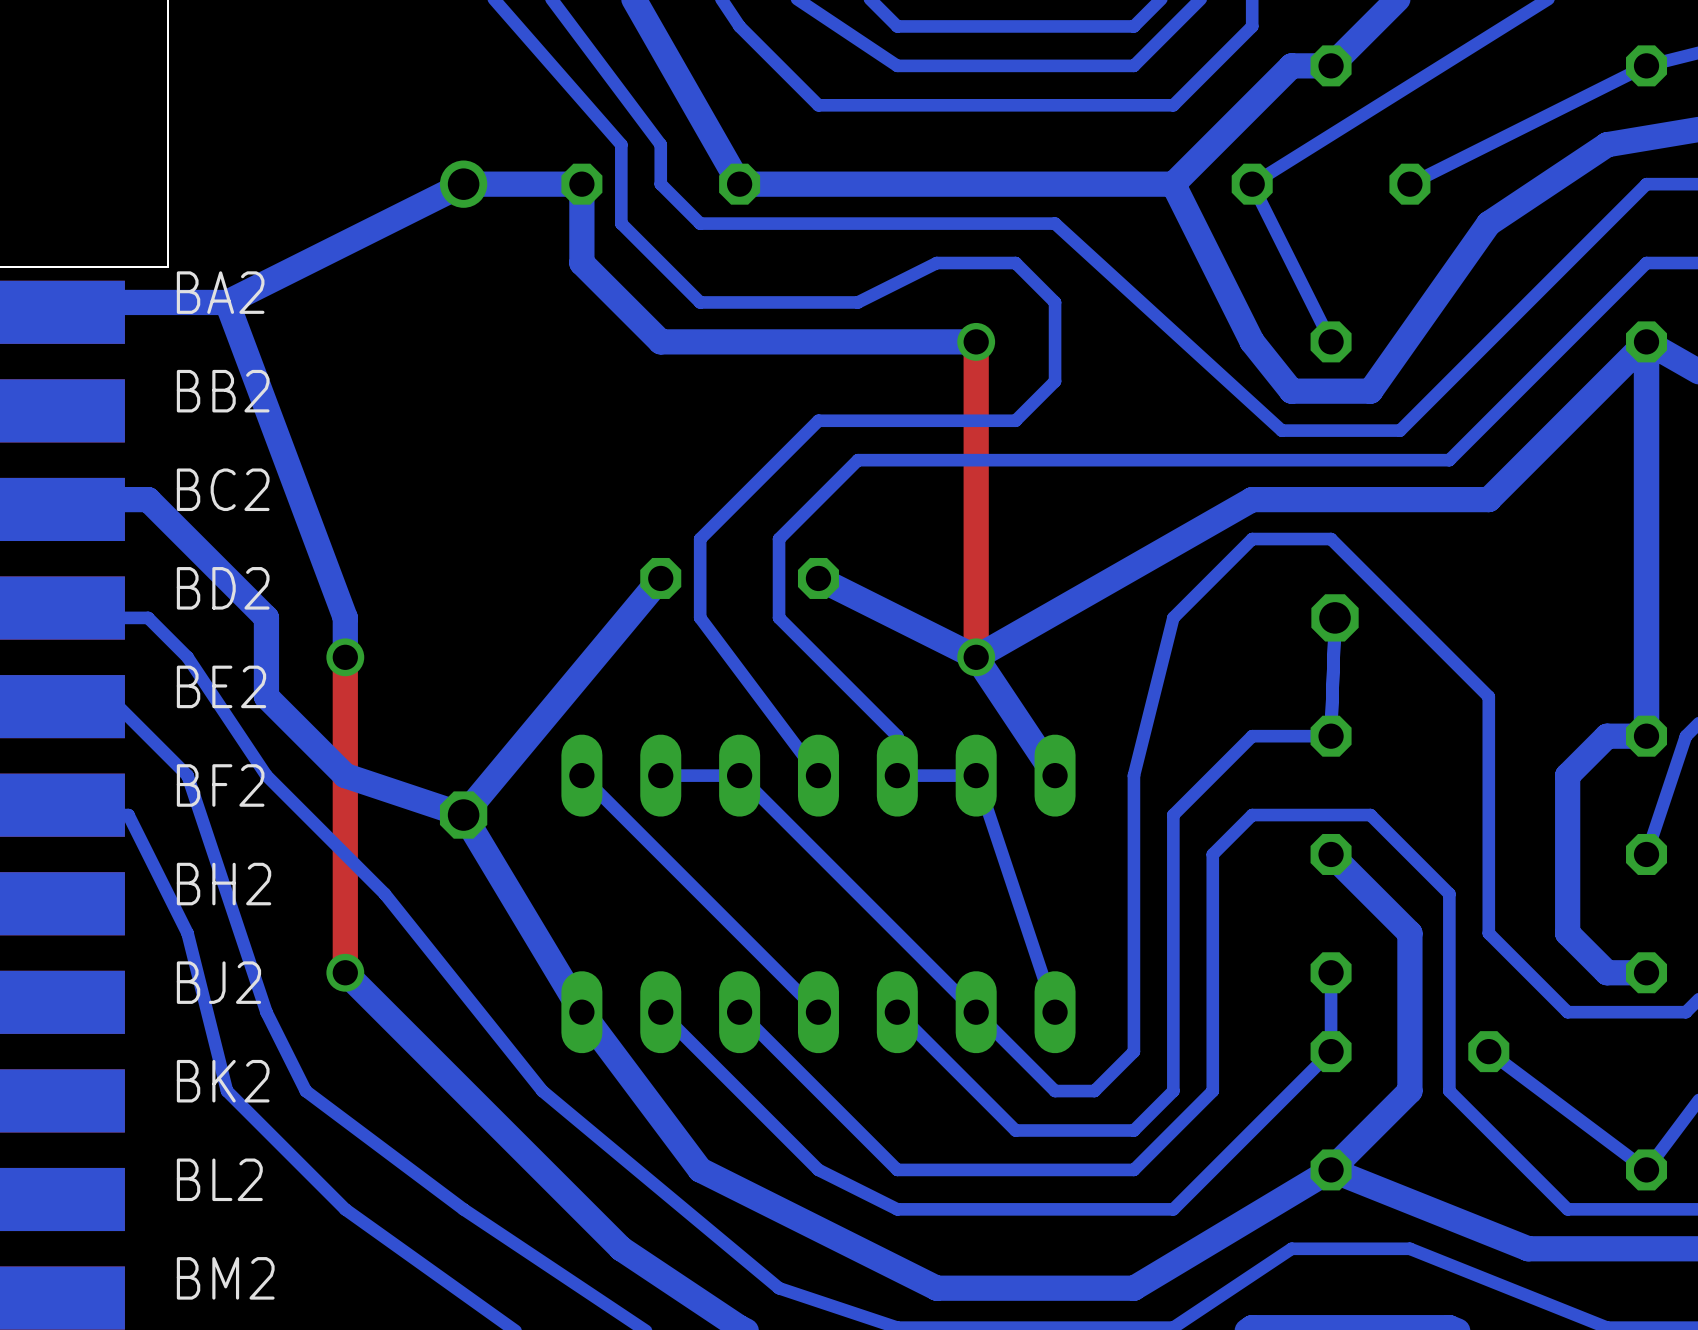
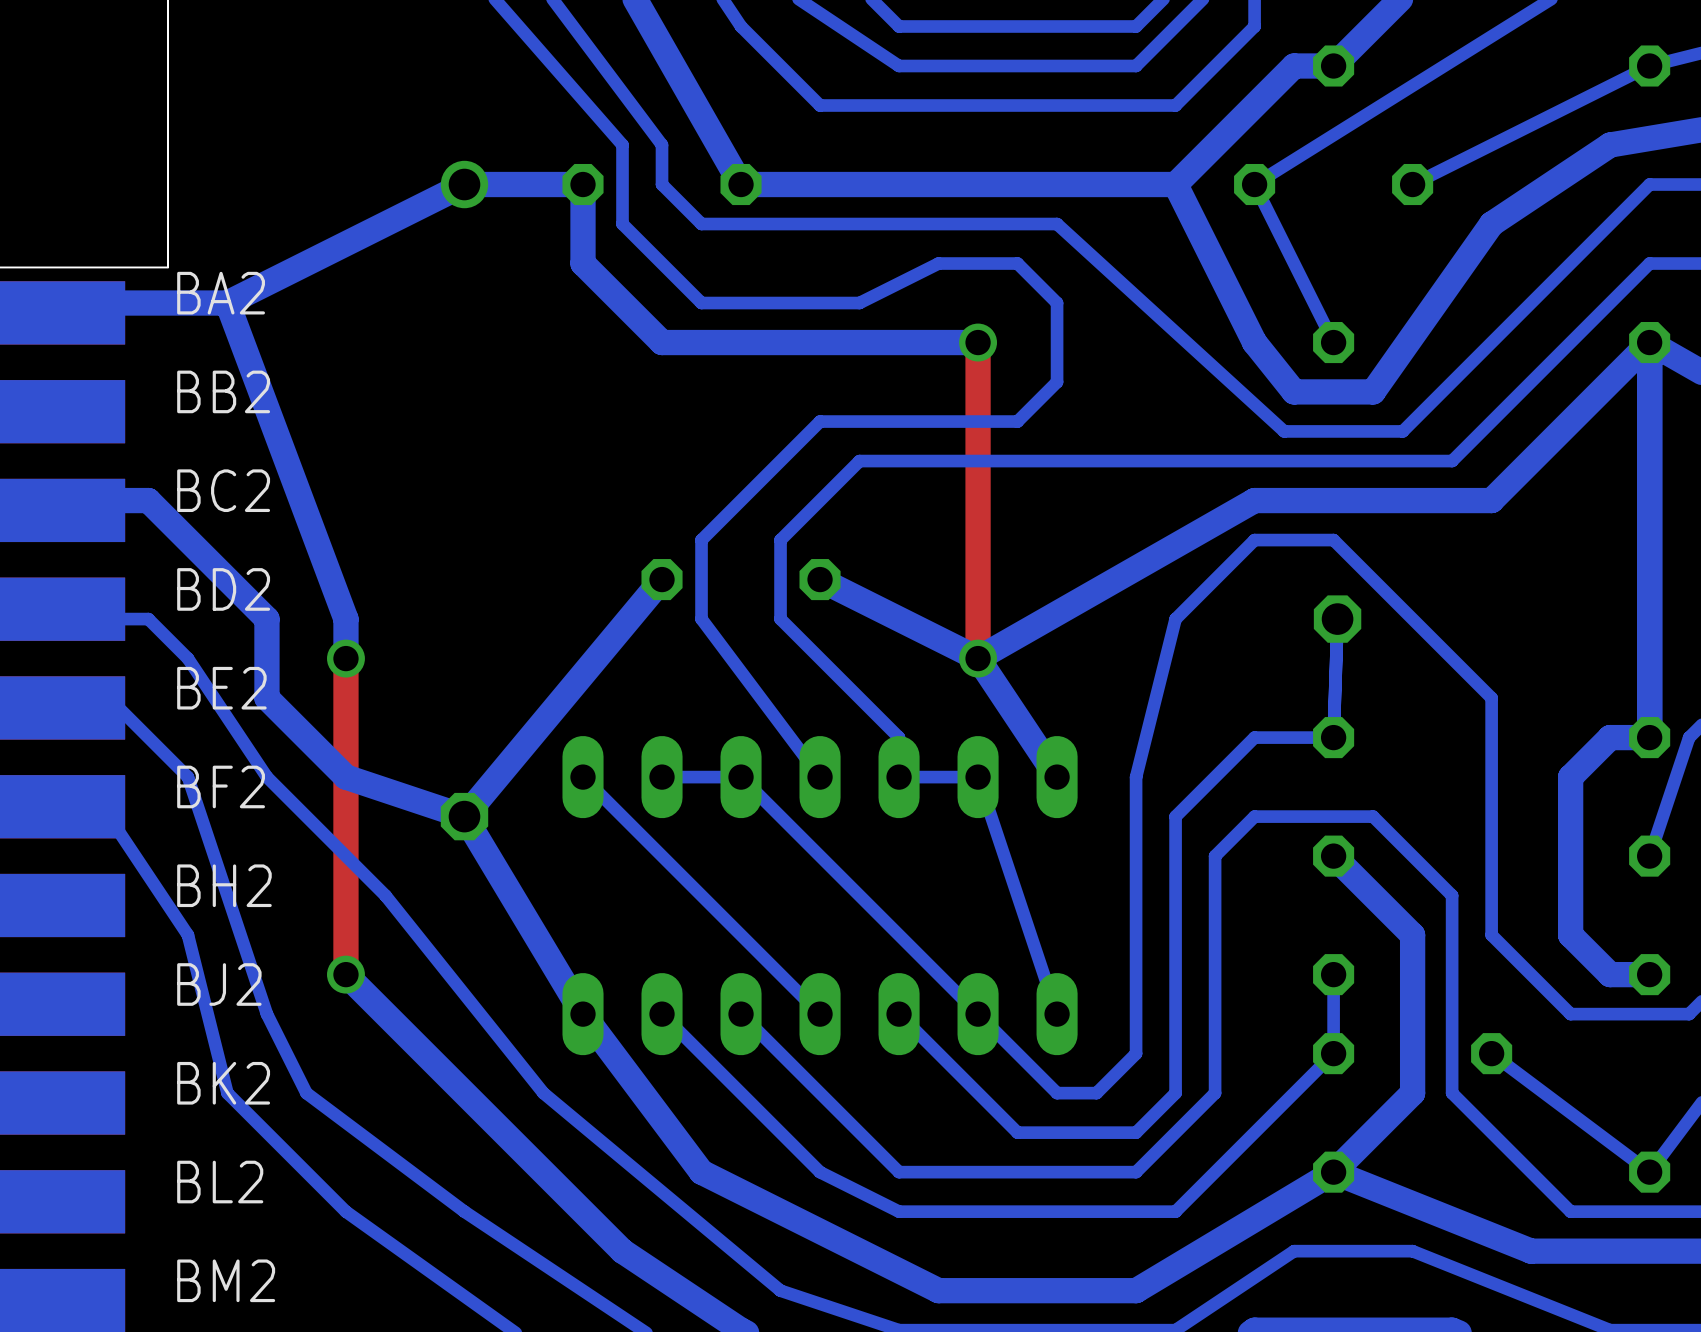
bottom track: (108, 815) (128, 815) (187, 933) -> (108, 816) (187, 935)

